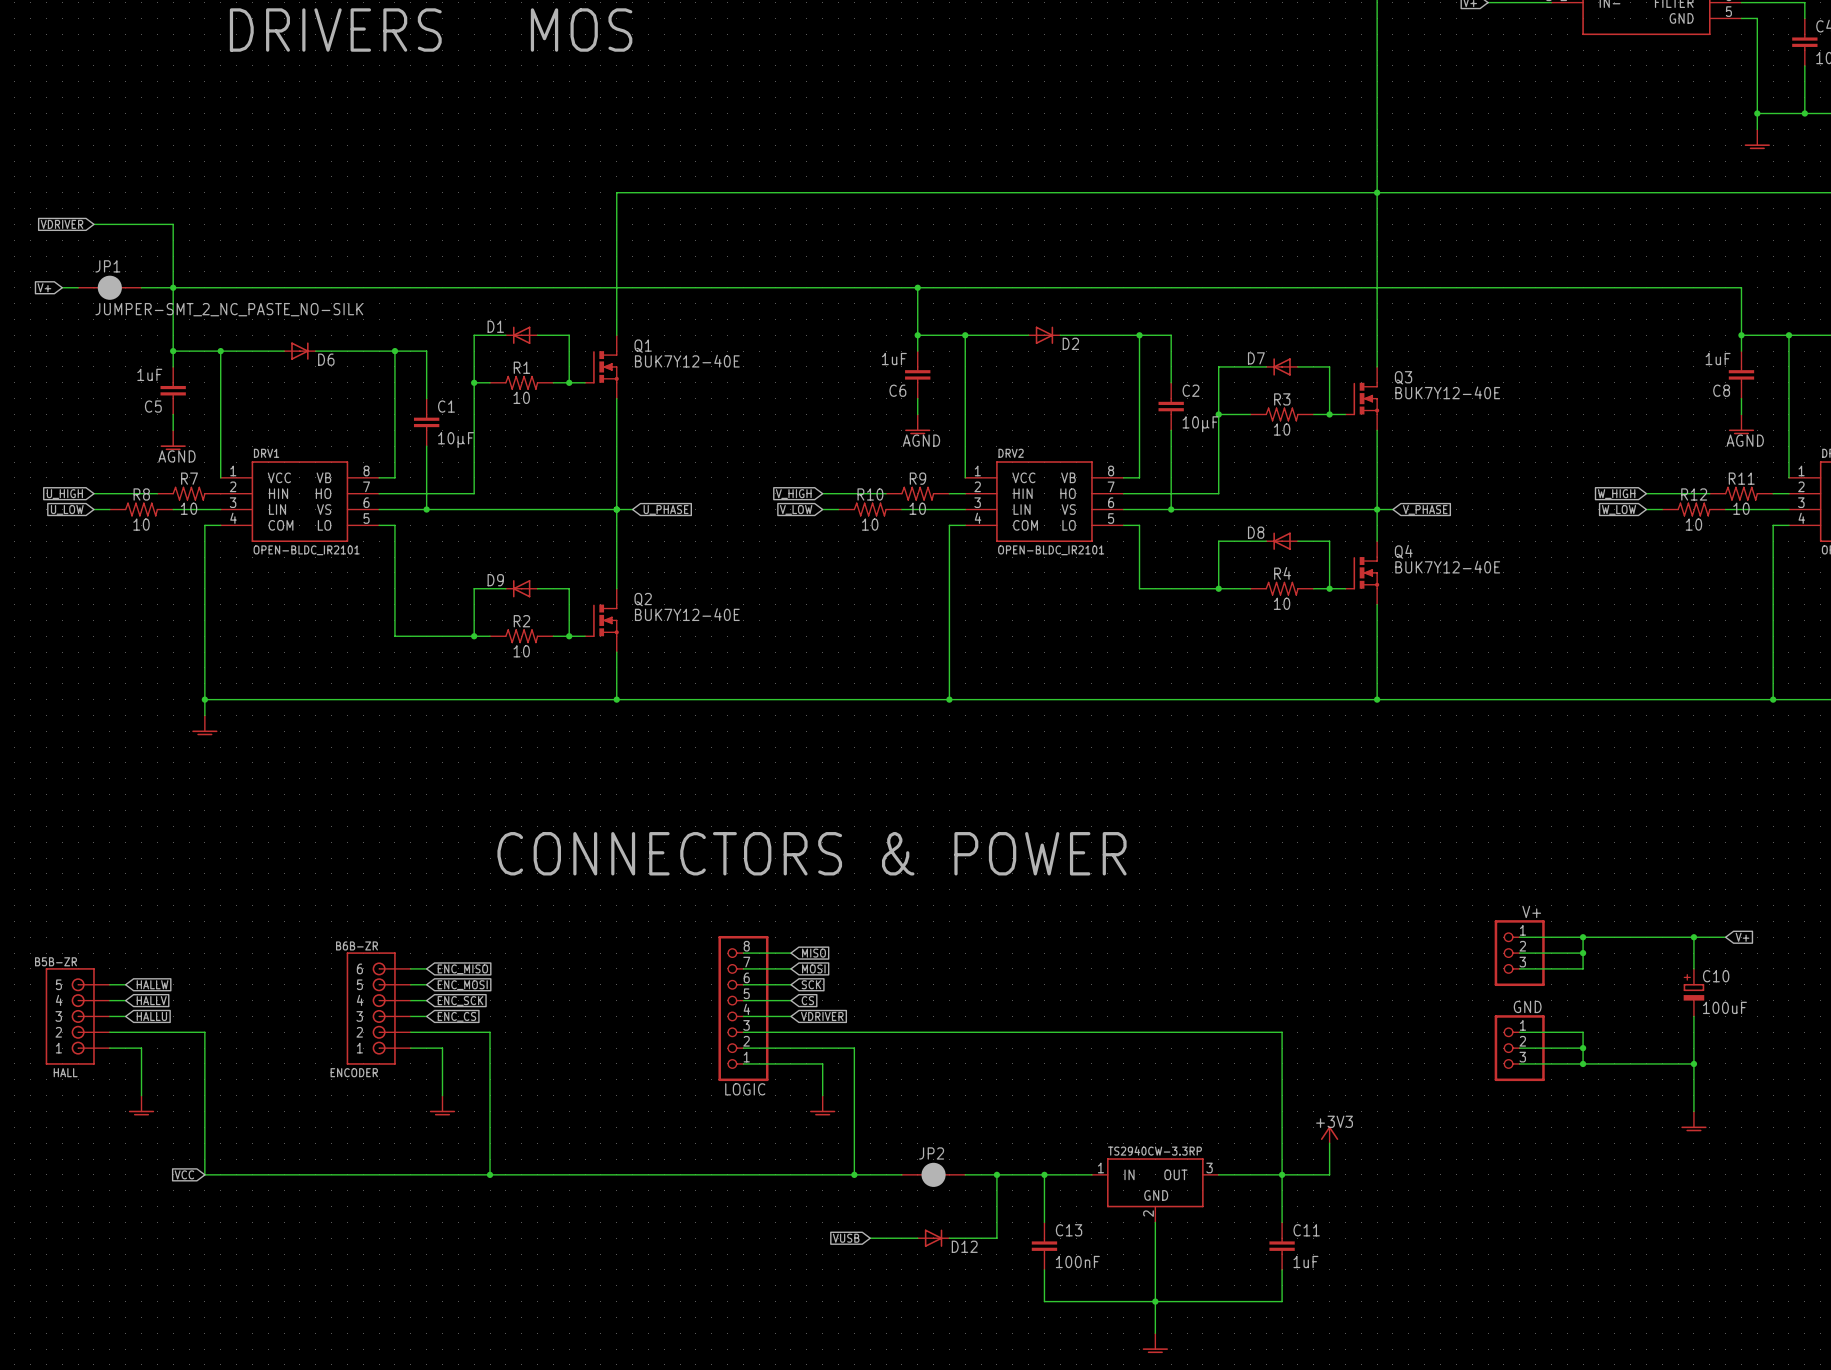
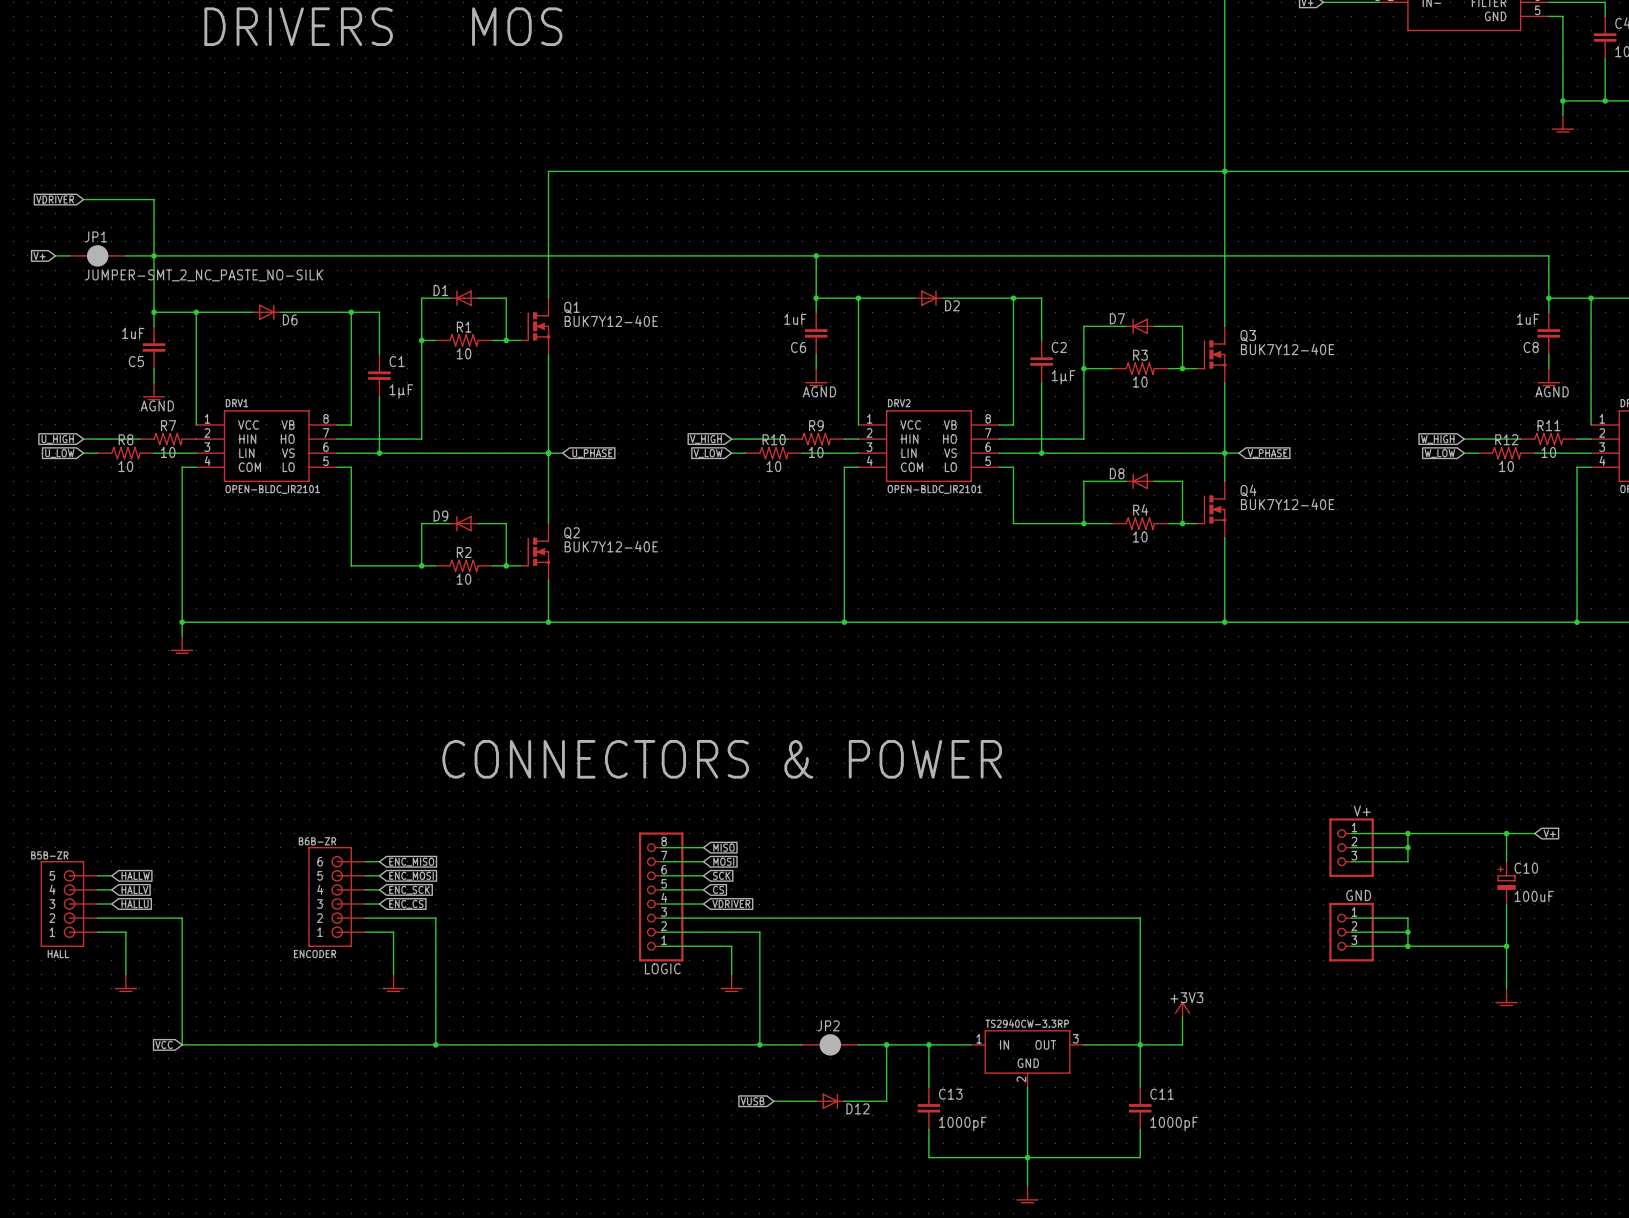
C2 value: 10µF (1200, 424) -> 1µF (1063, 377)
C1 value: 10µF (455, 440) -> 1µF (401, 391)
C13 value: 100nF (1077, 1261) -> 1000pF (962, 1124)
C11 value: 1uF (1305, 1261) -> 1000pF (1174, 1124)

